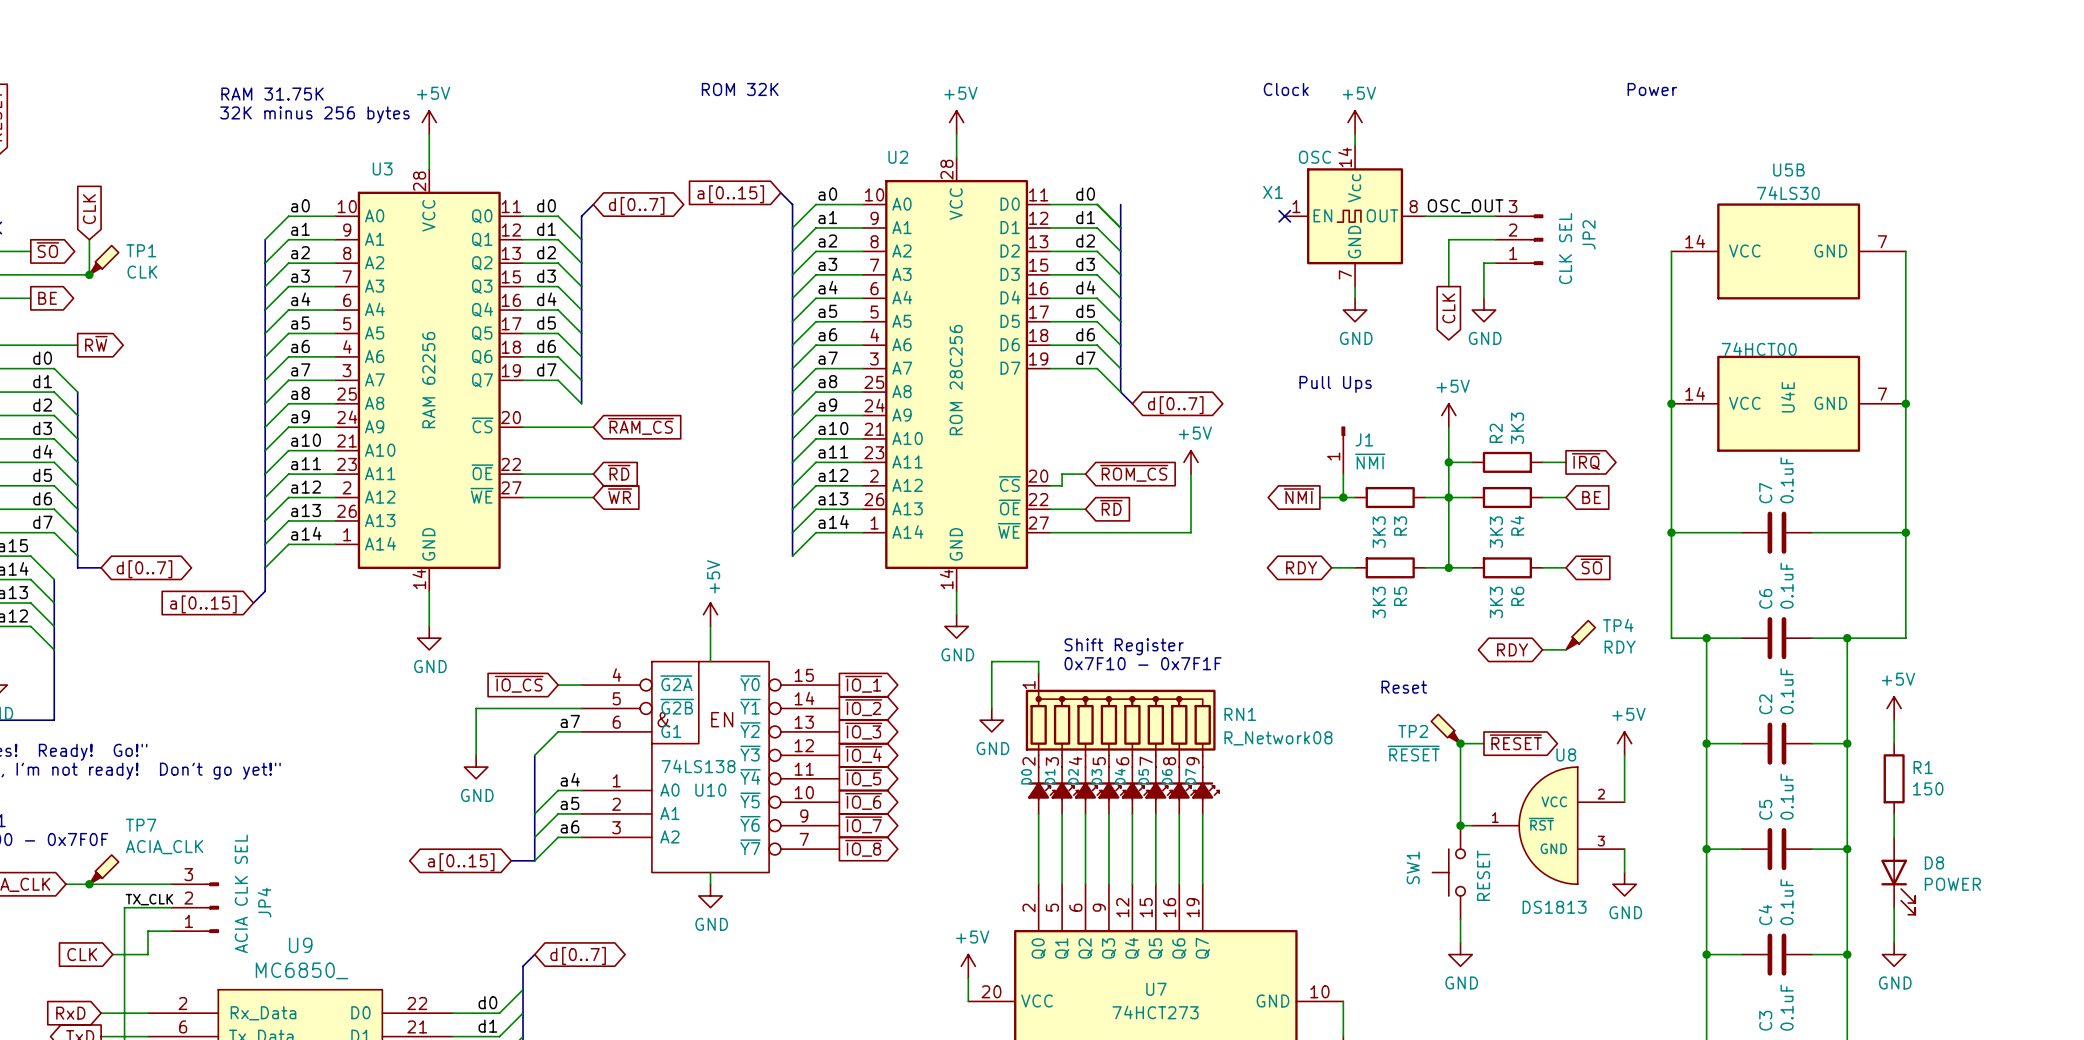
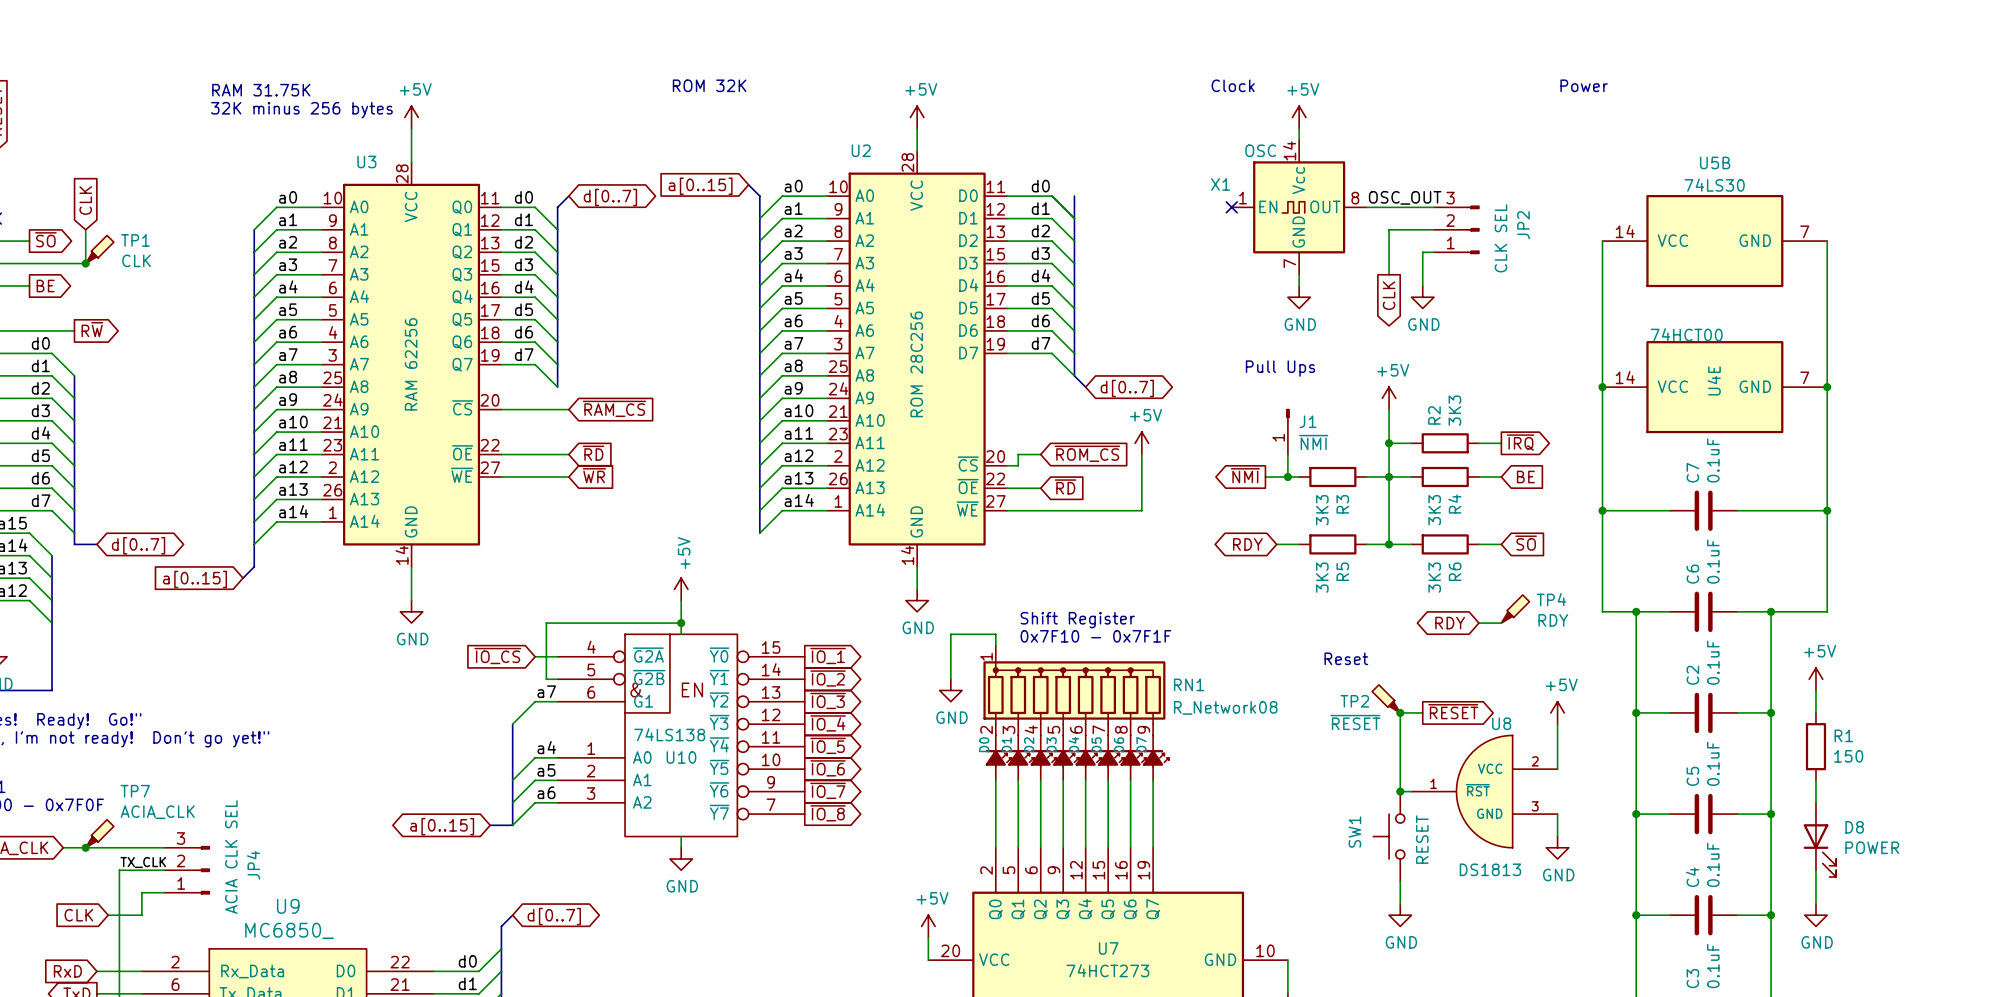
junction: none -> (681, 623)
wire: (569, 708) (476, 708) (476, 755) -> (546, 679) (546, 623) (681, 623)
power symbol: GND (476, 767) -> none

